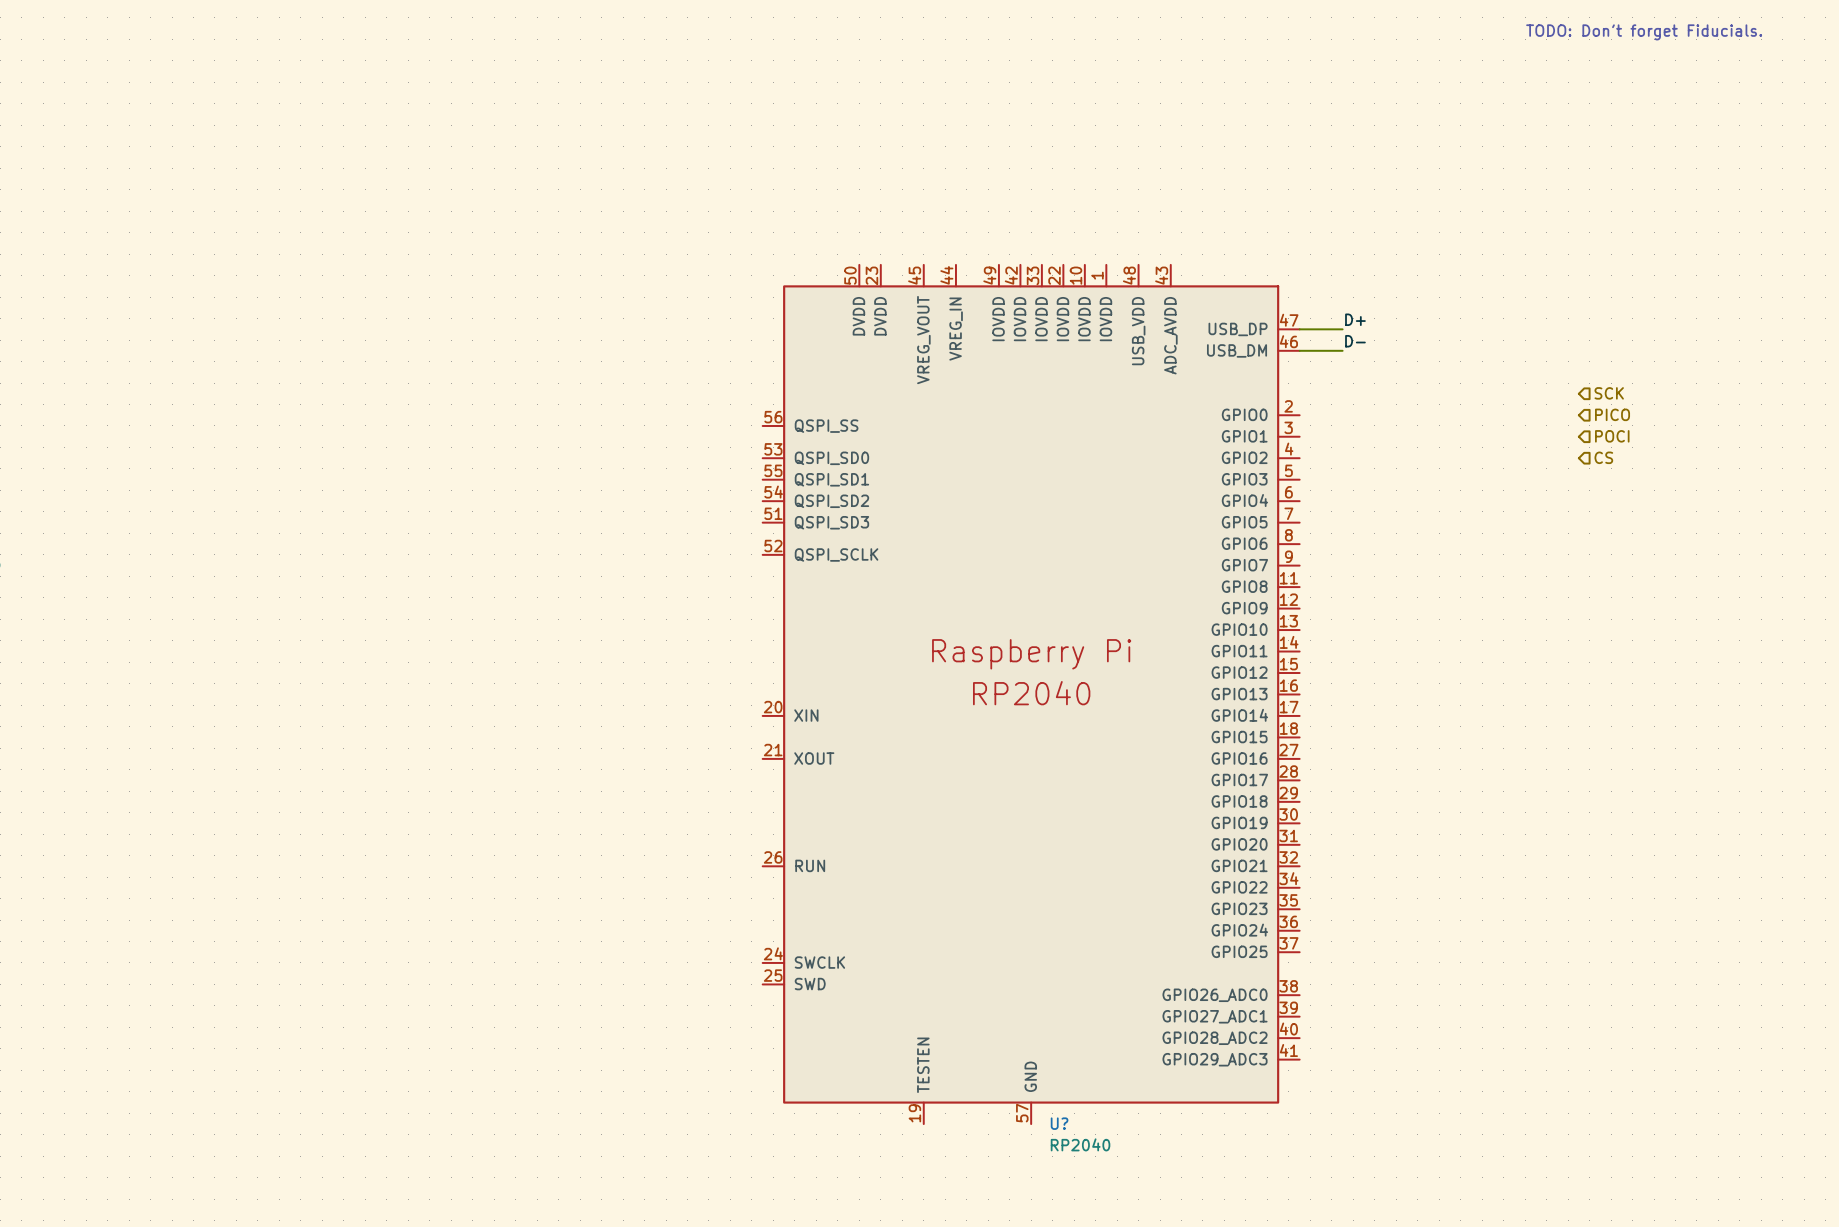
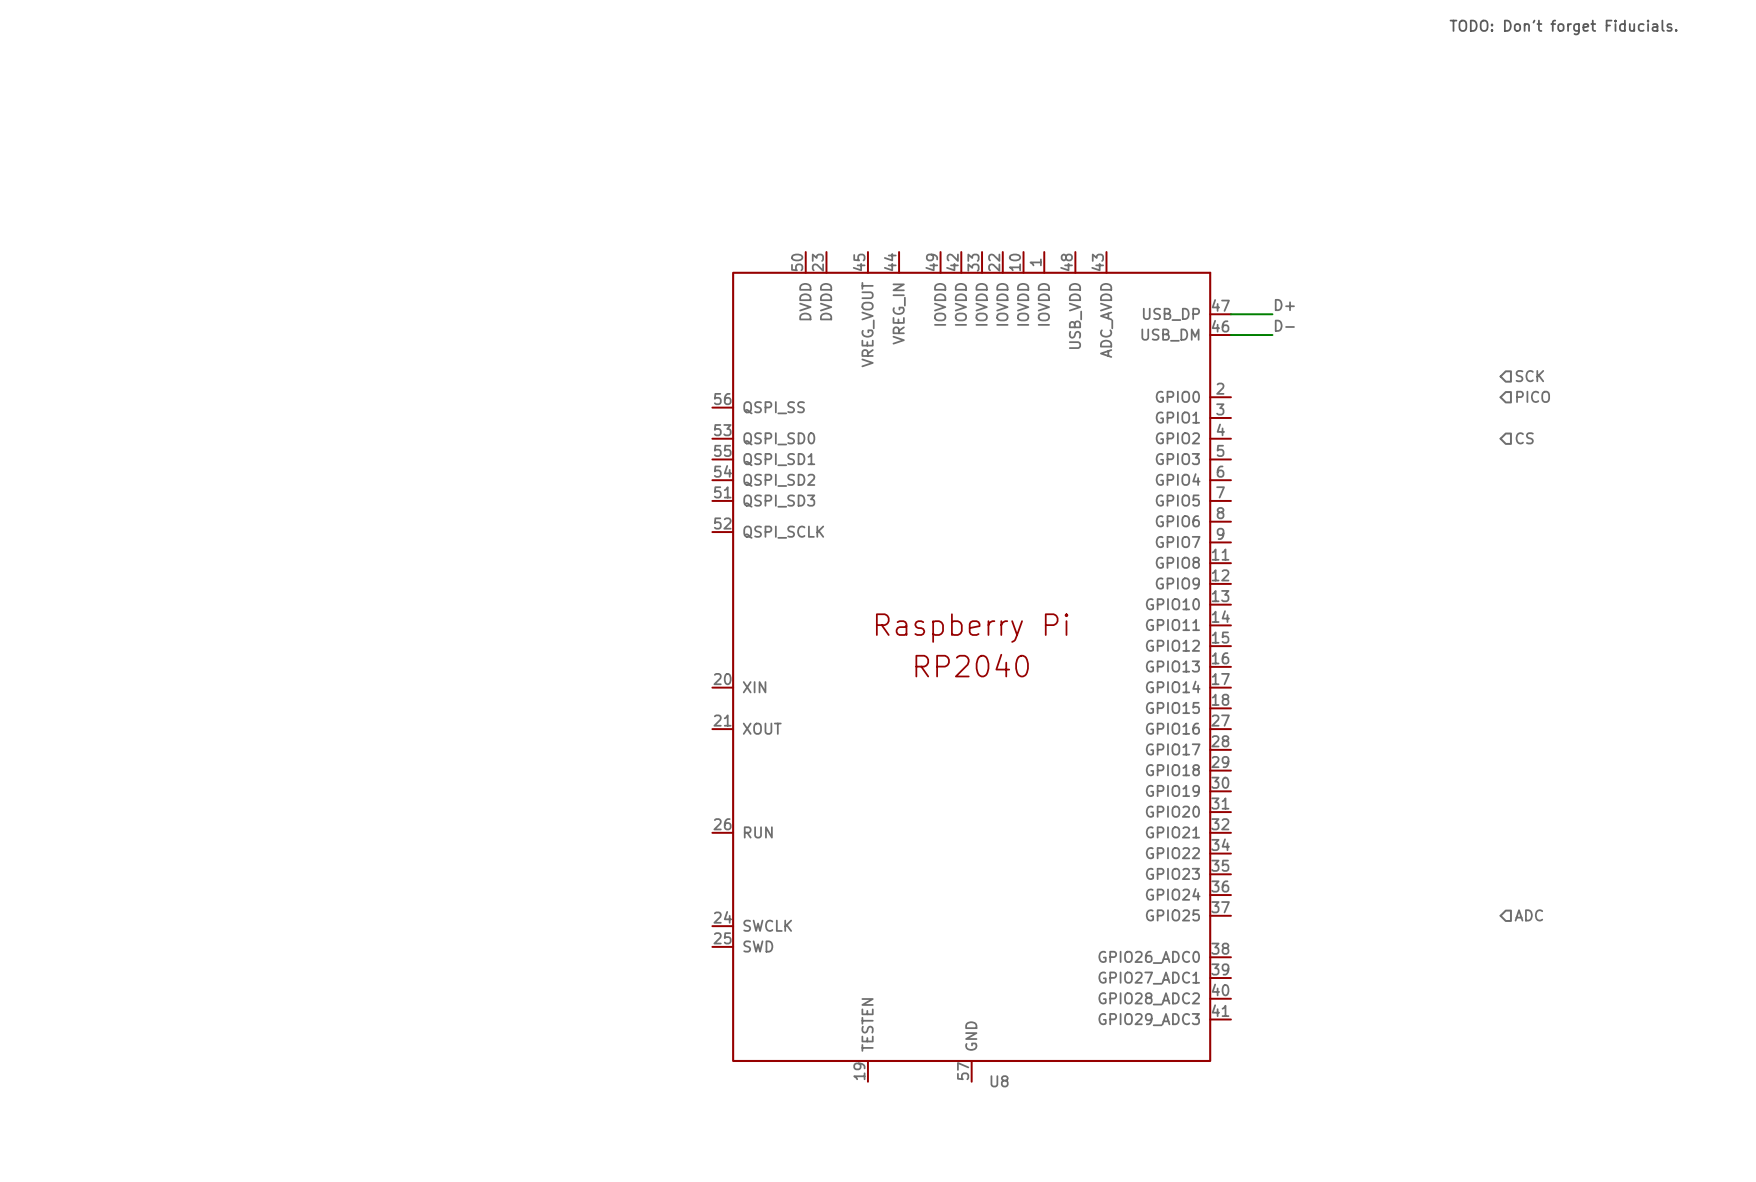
hierarchical label: POCI (1612, 436) -> none
hierarchical label: none -> ADC (1528, 915)
U? name: U? (1059, 1123) -> U8 (999, 1081)
U? value: RP2040 (1080, 1144) -> none

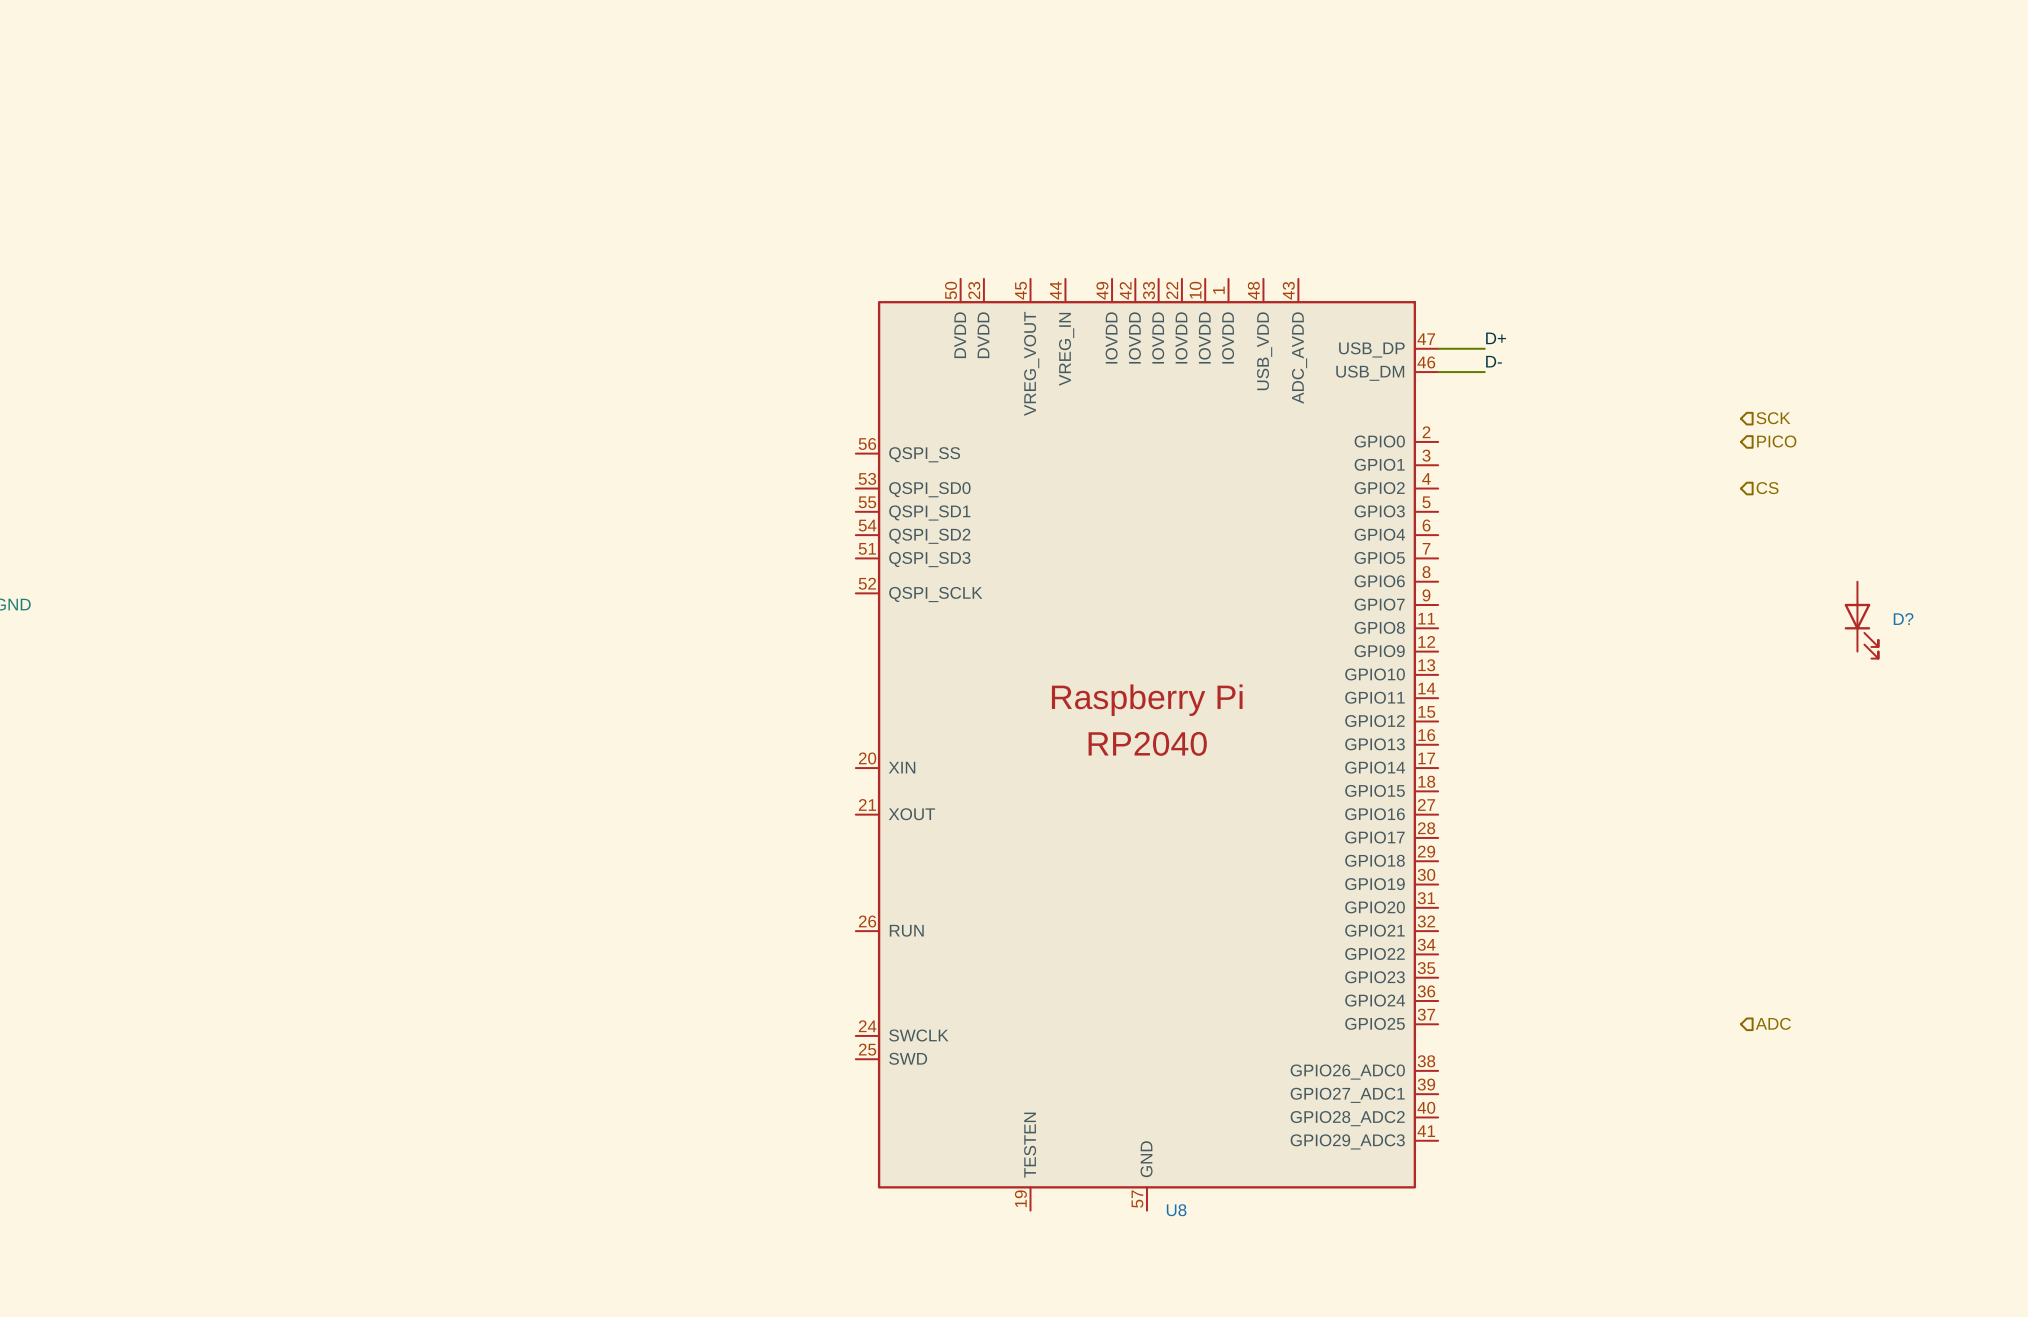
text: TODO: Don't forget Fiducials. (1563, 27) -> none
D?: none -> (1861, 620)

